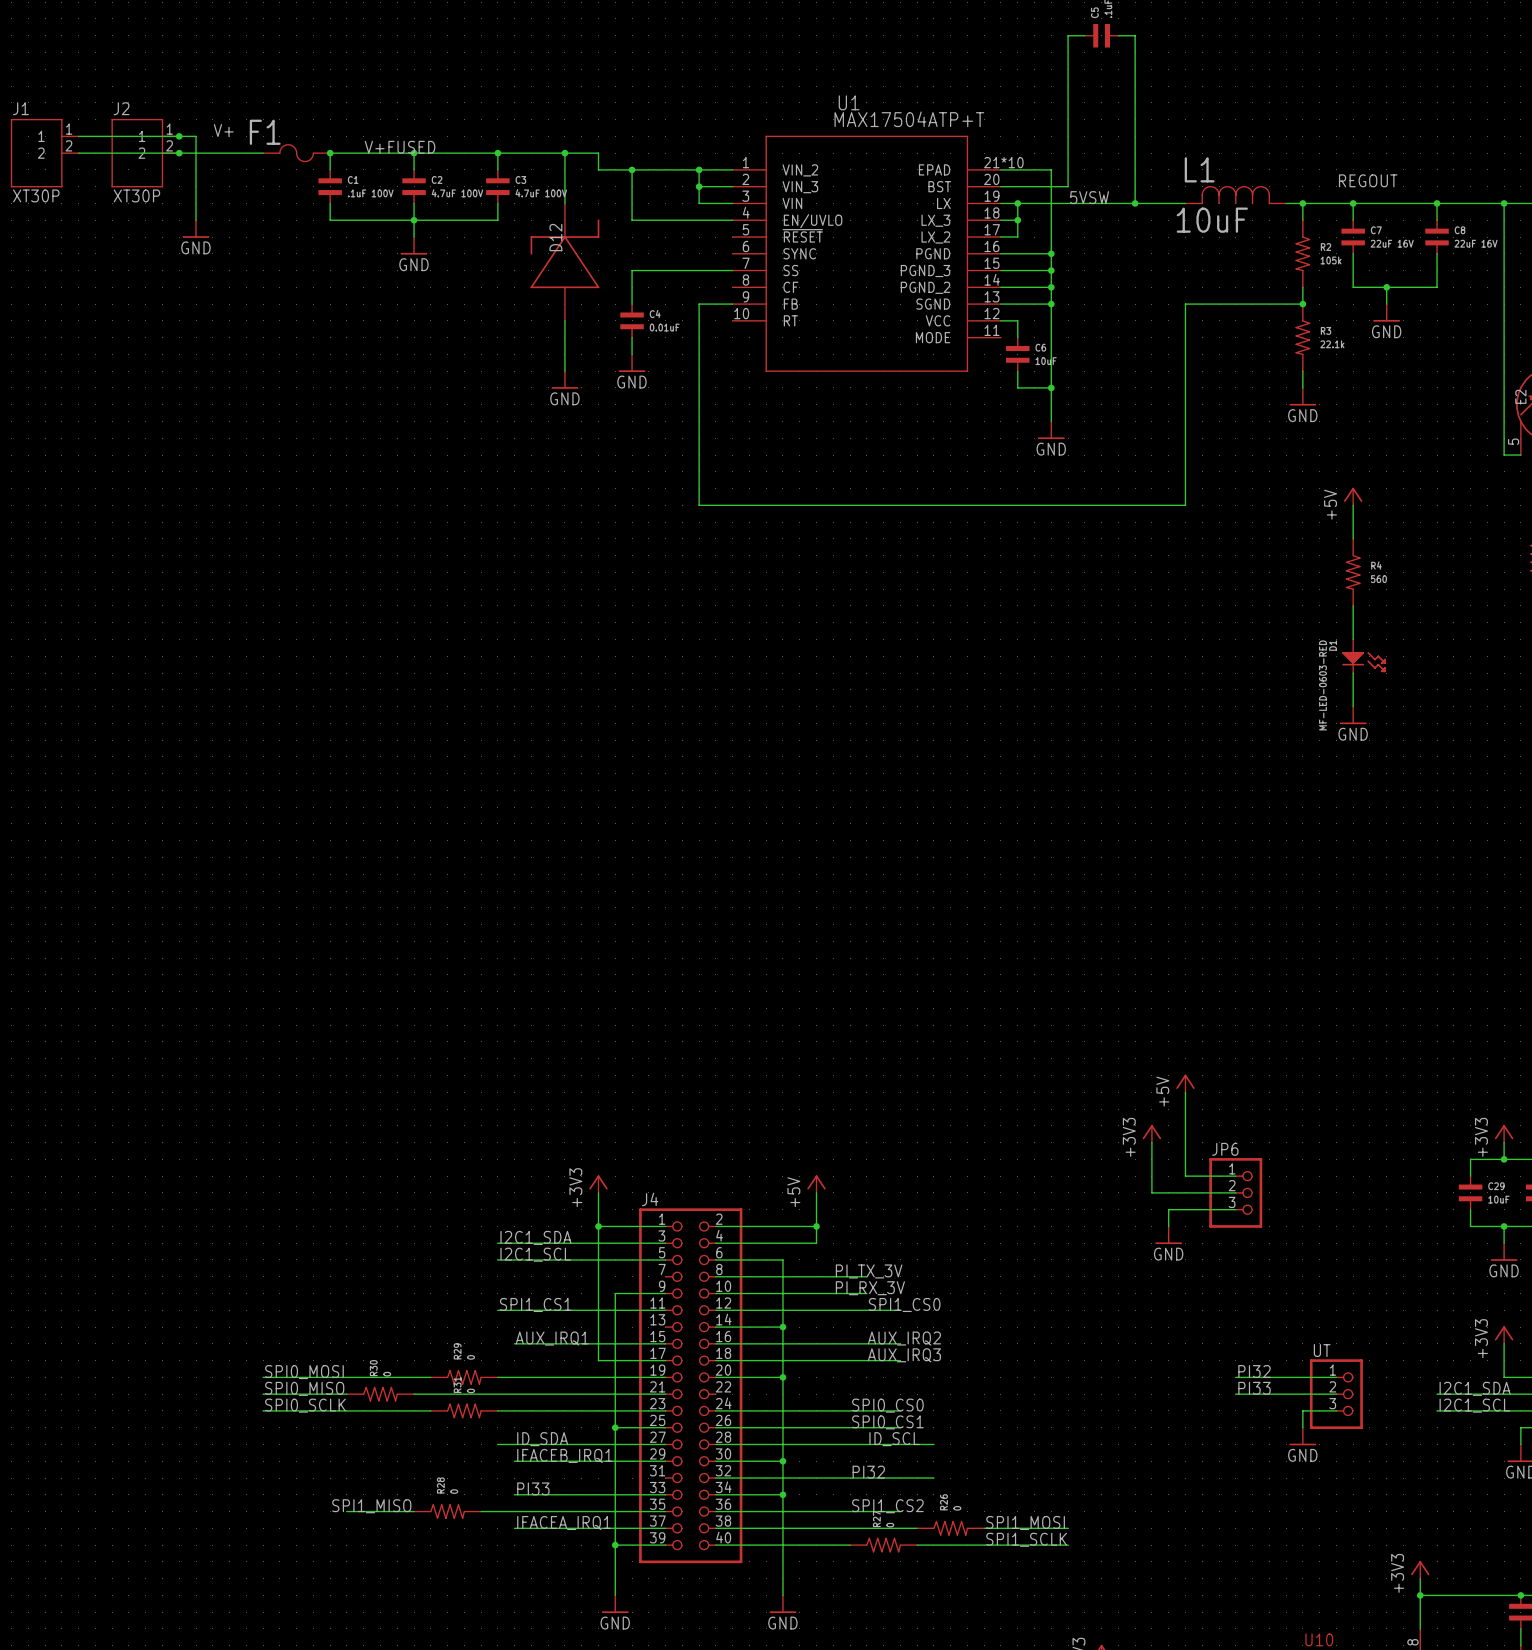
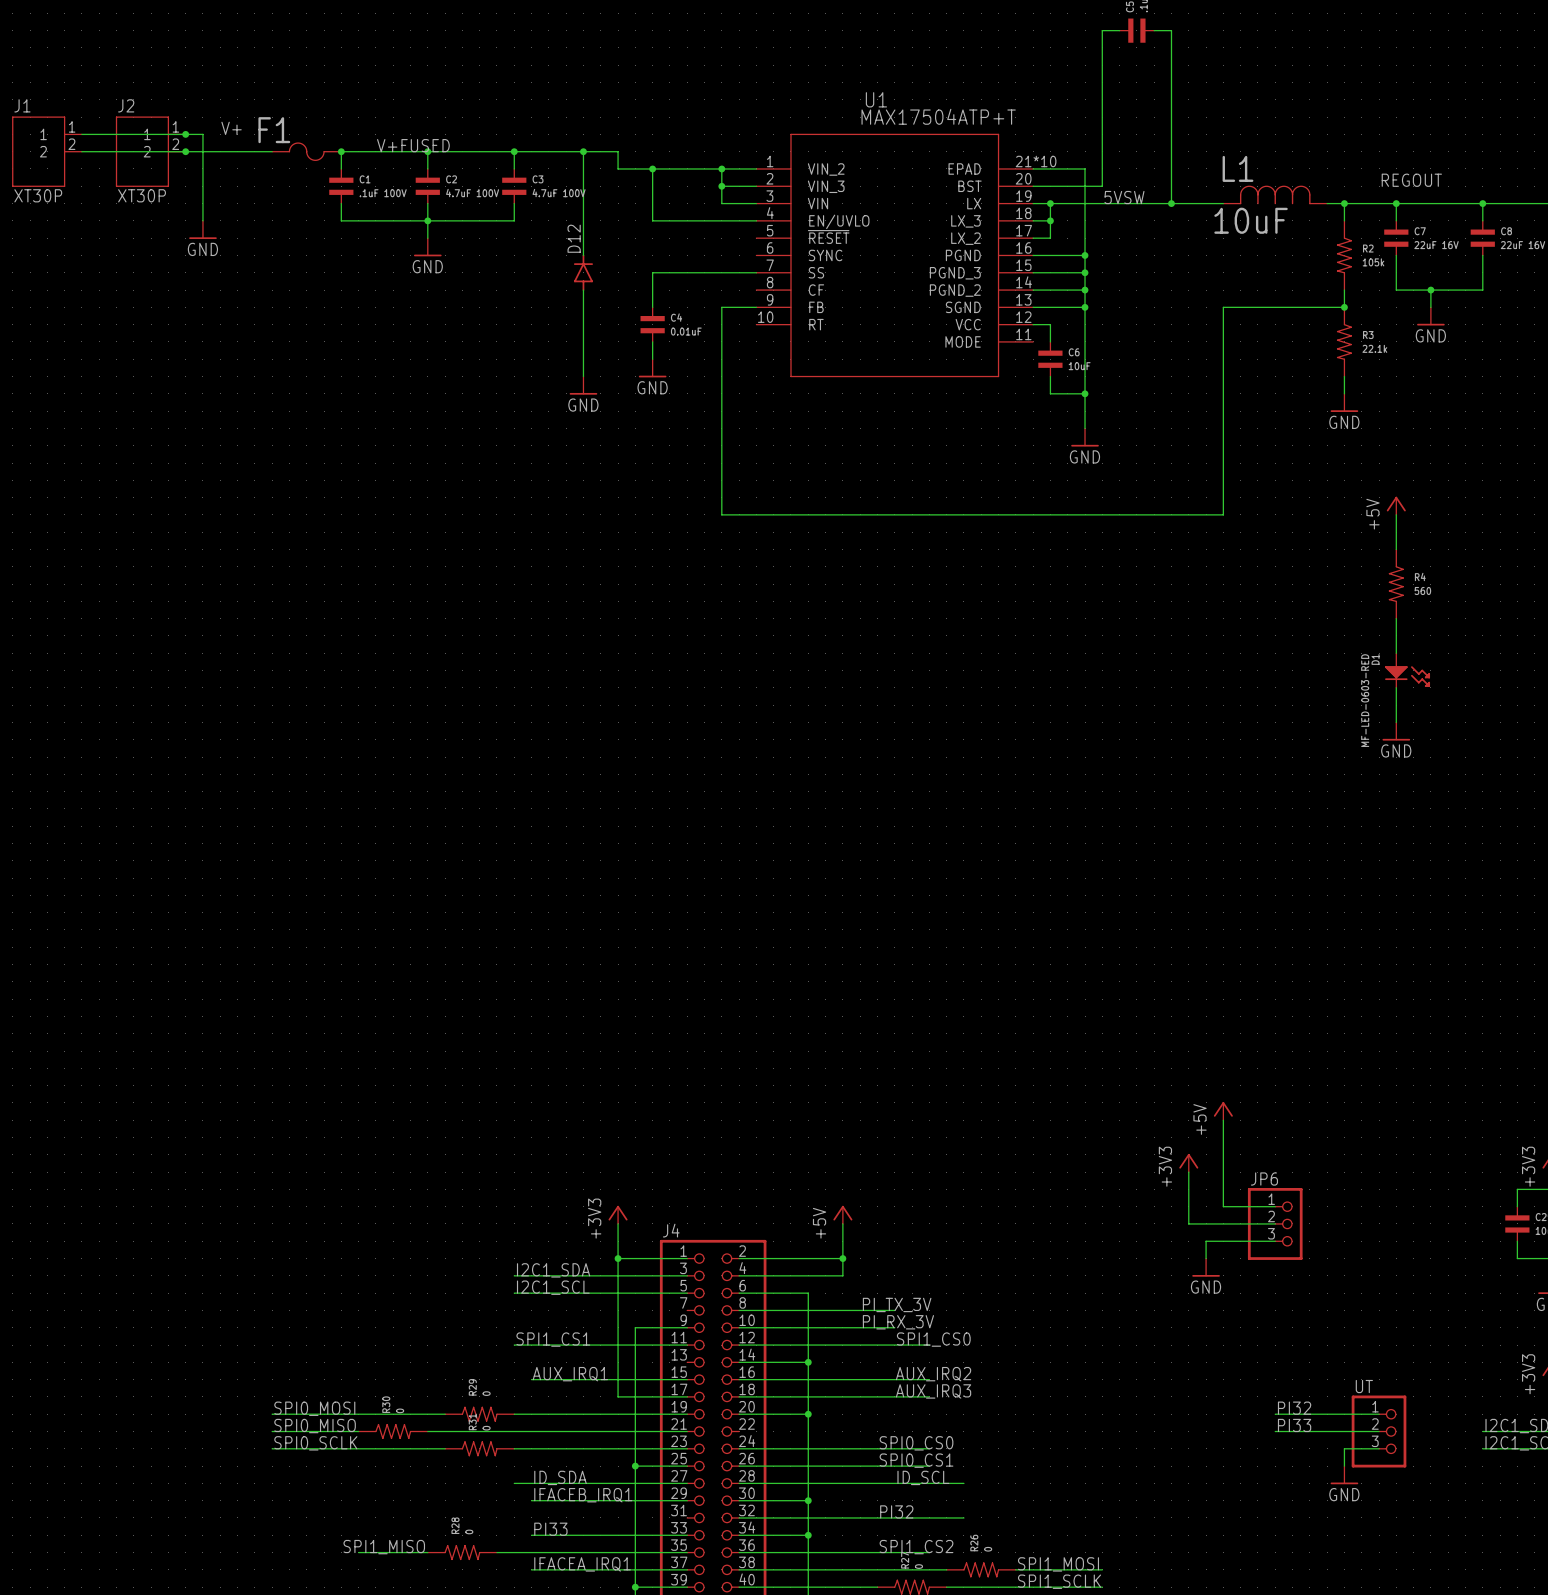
D12 symbol: [530, 203, 600, 321] -> [573, 254, 593, 291]

